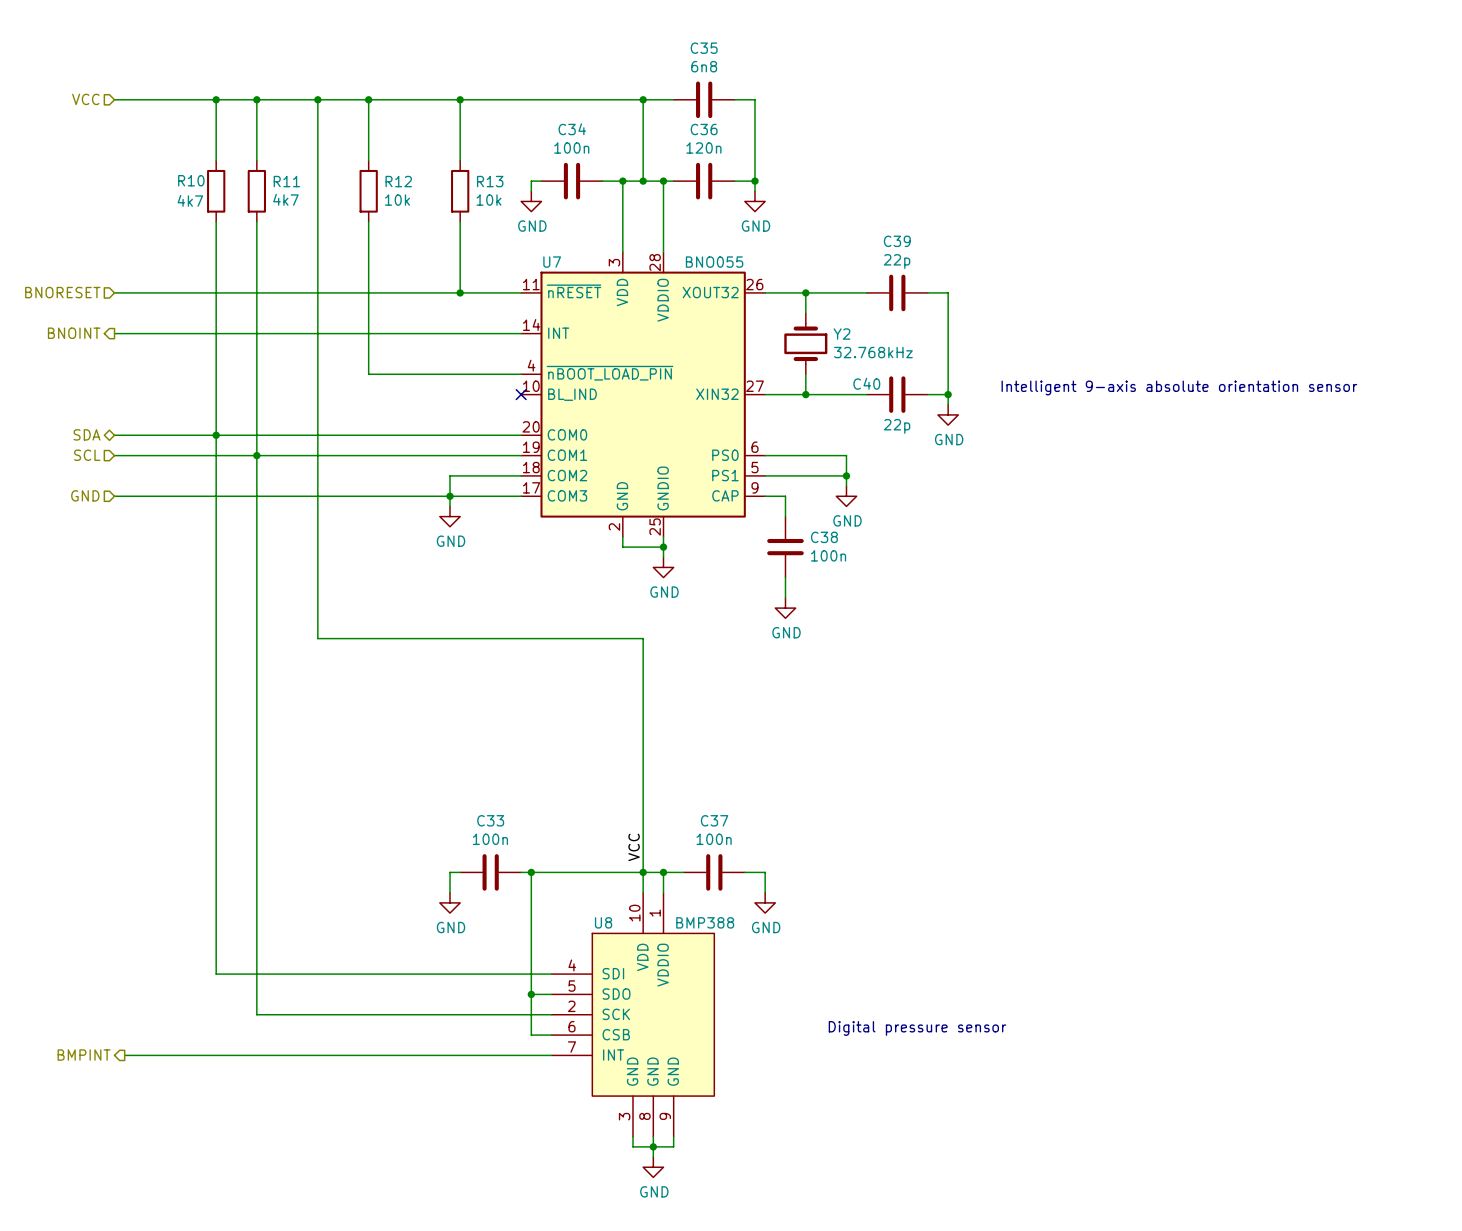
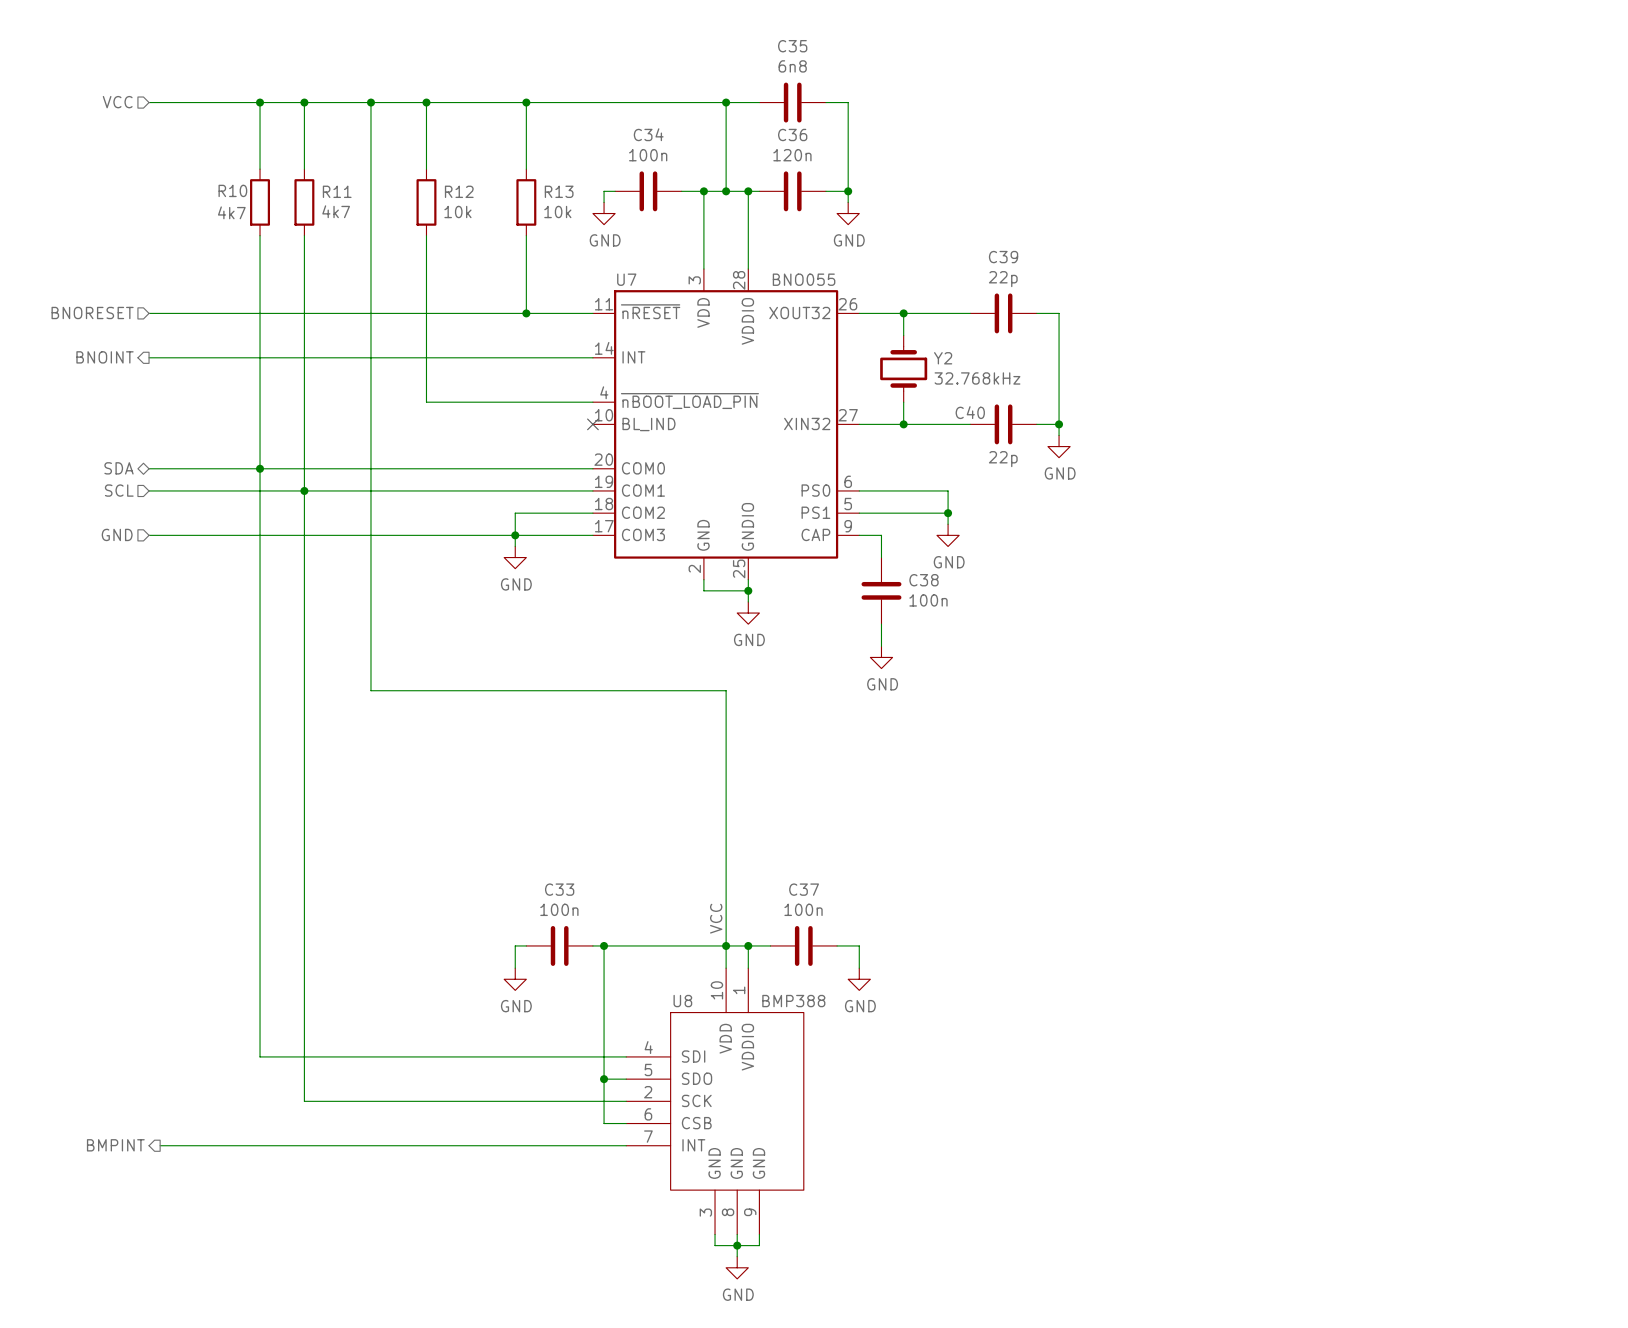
text: Intelligent 9-axis absolute orientation sensor (1179, 387) -> none
text: Digital pressure sensor (917, 1028) -> none

